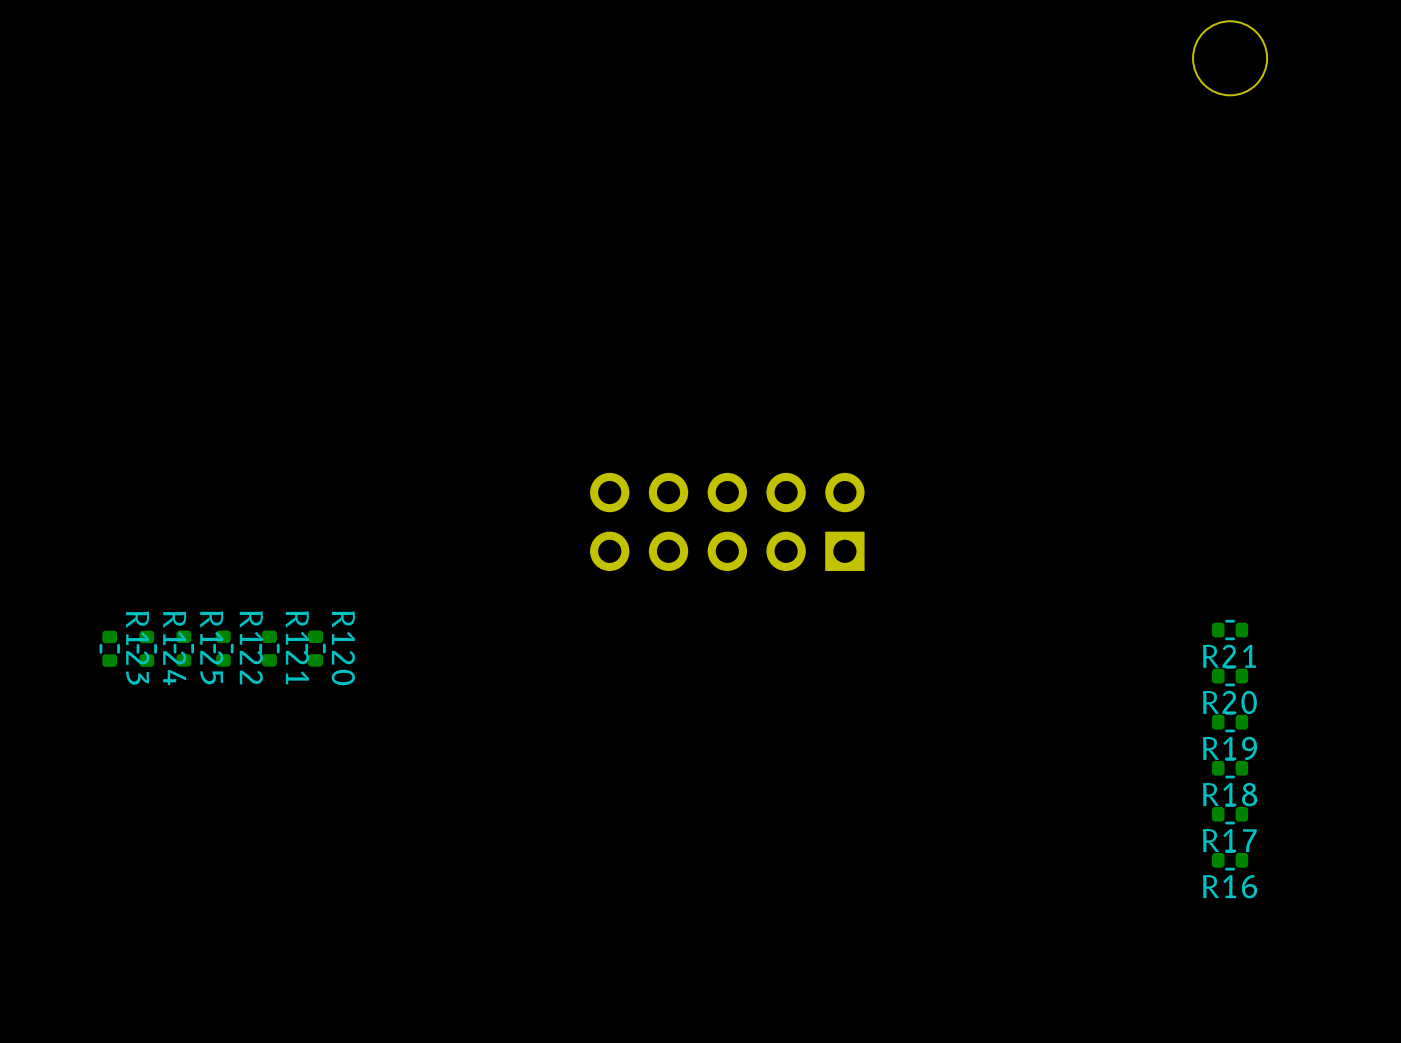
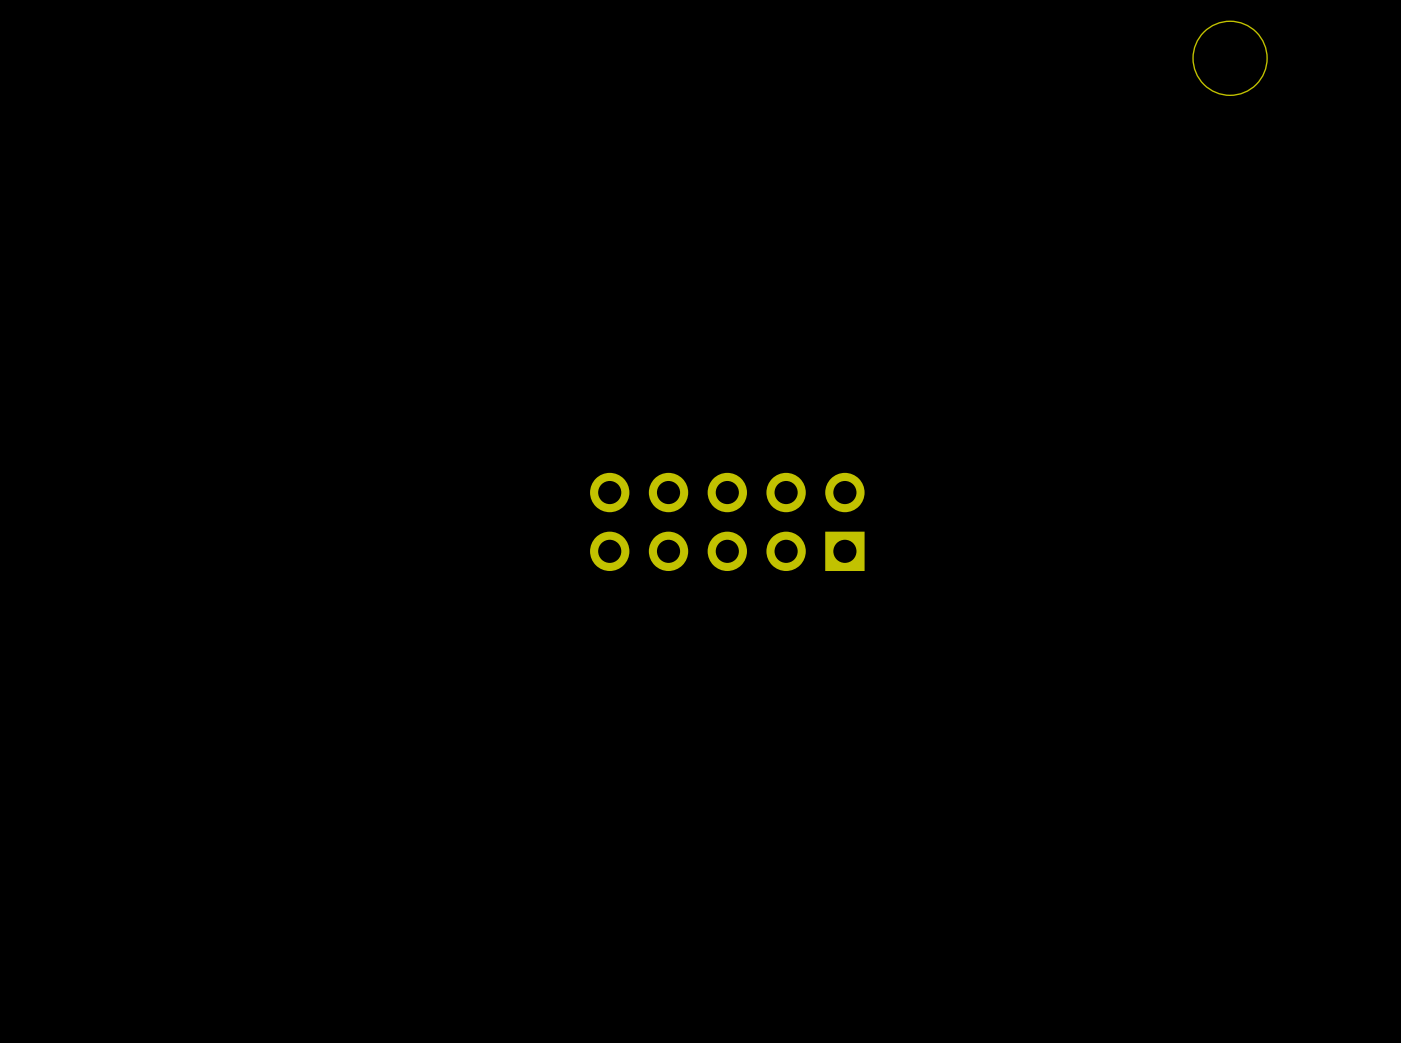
R21: (1230, 630) -> none
R123: (109, 648) -> none
R124: (146, 648) -> none
R125: (183, 648) -> none
R122: (223, 648) -> none
R121: (269, 648) -> none
R120: (315, 648) -> none
R20: (1230, 676) -> none
R19: (1230, 722) -> none
R18: (1230, 768) -> none
R17: (1230, 814) -> none
R16: (1230, 860) -> none

